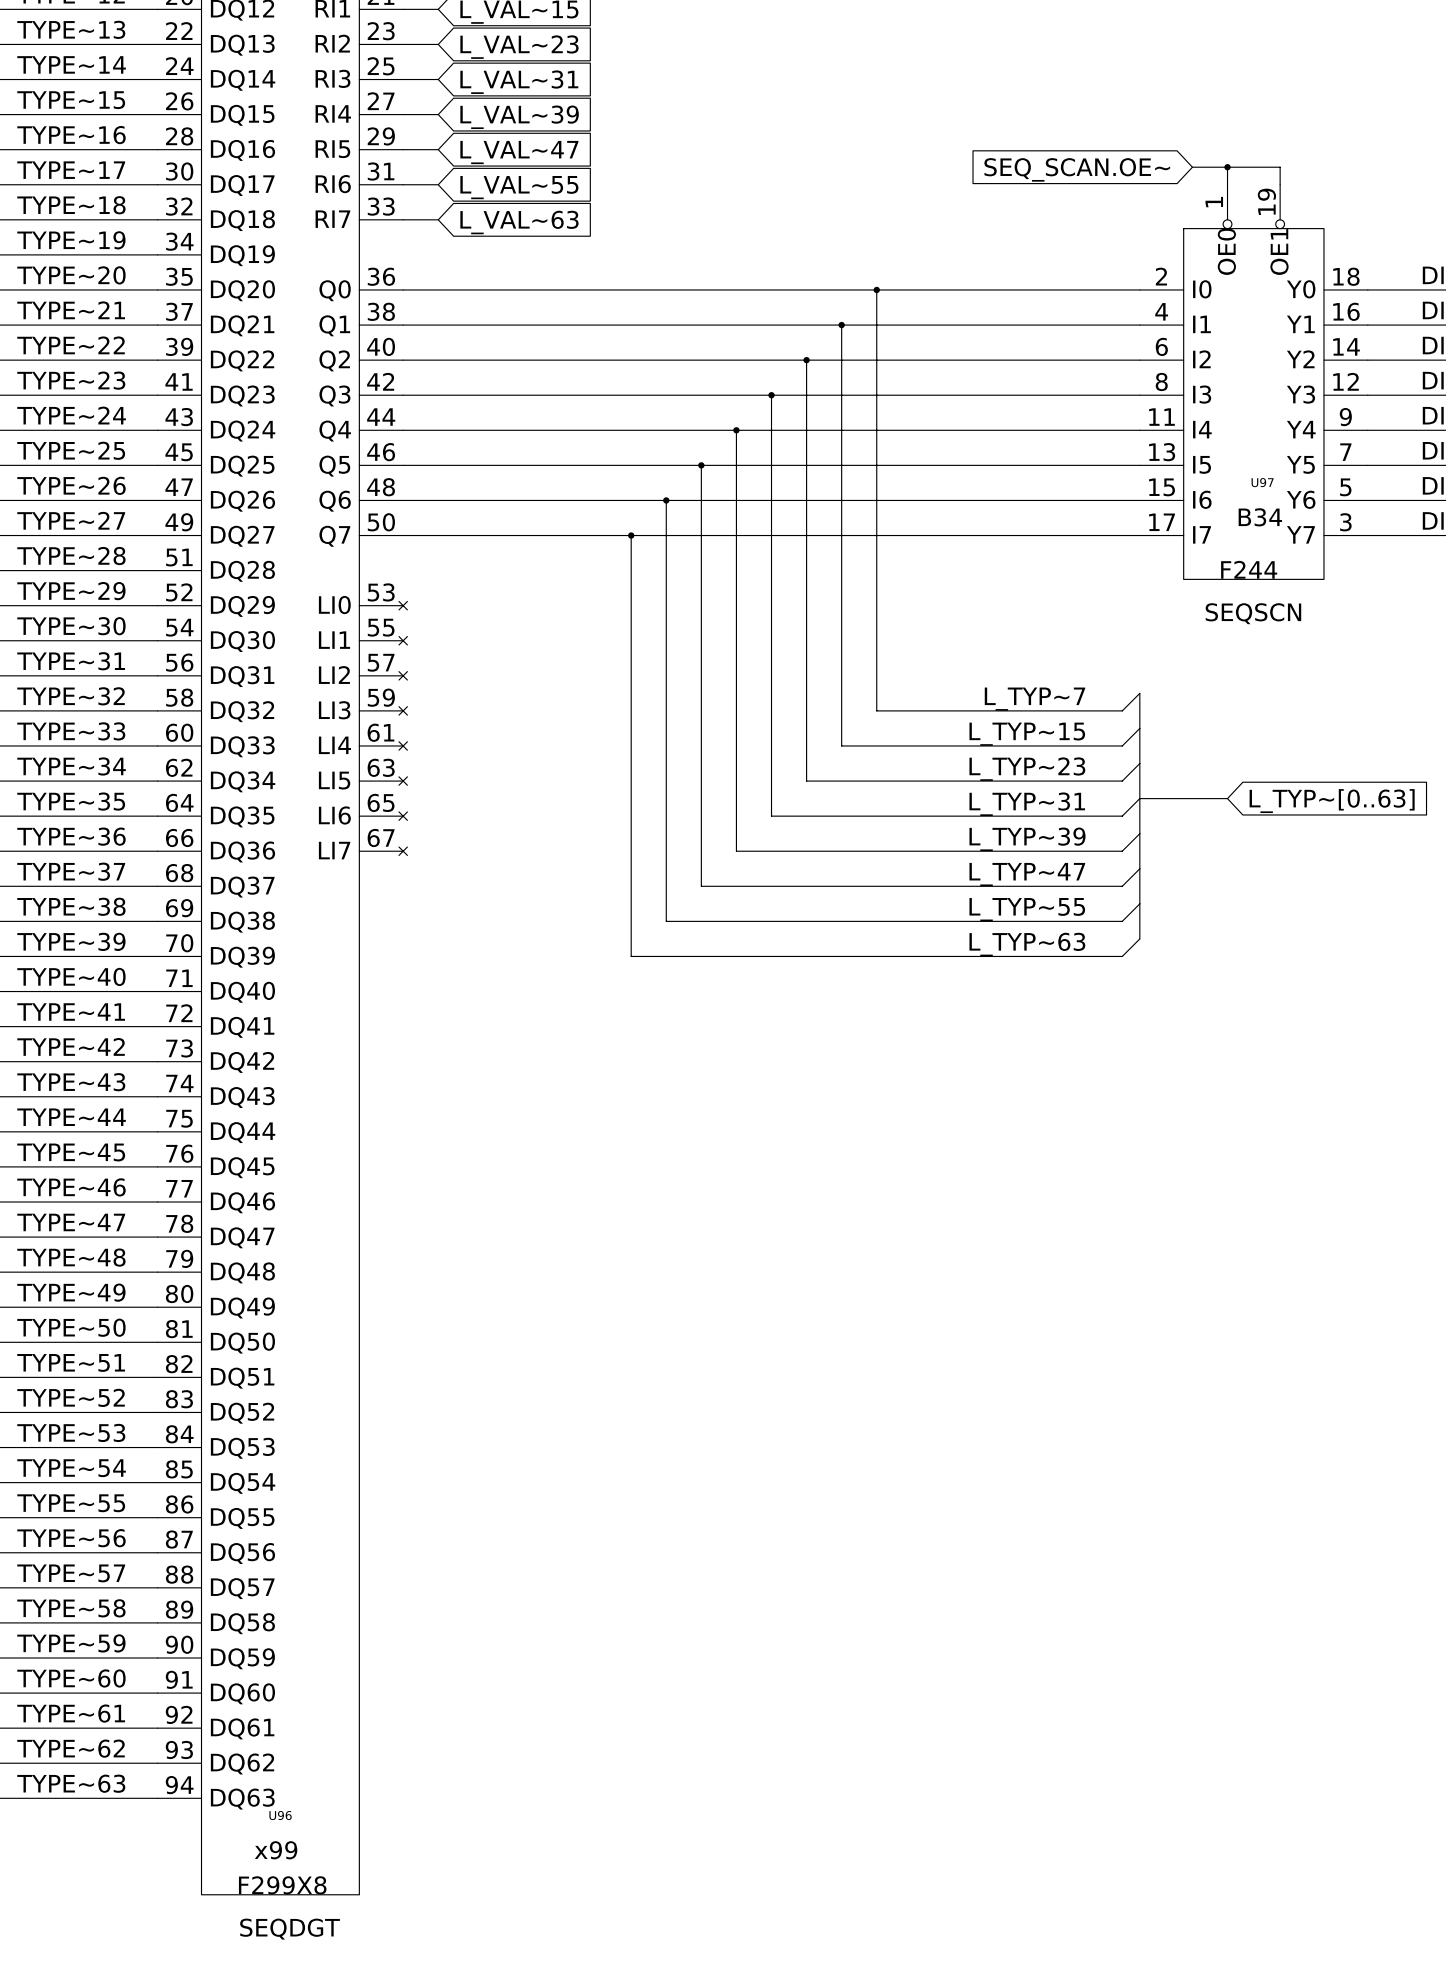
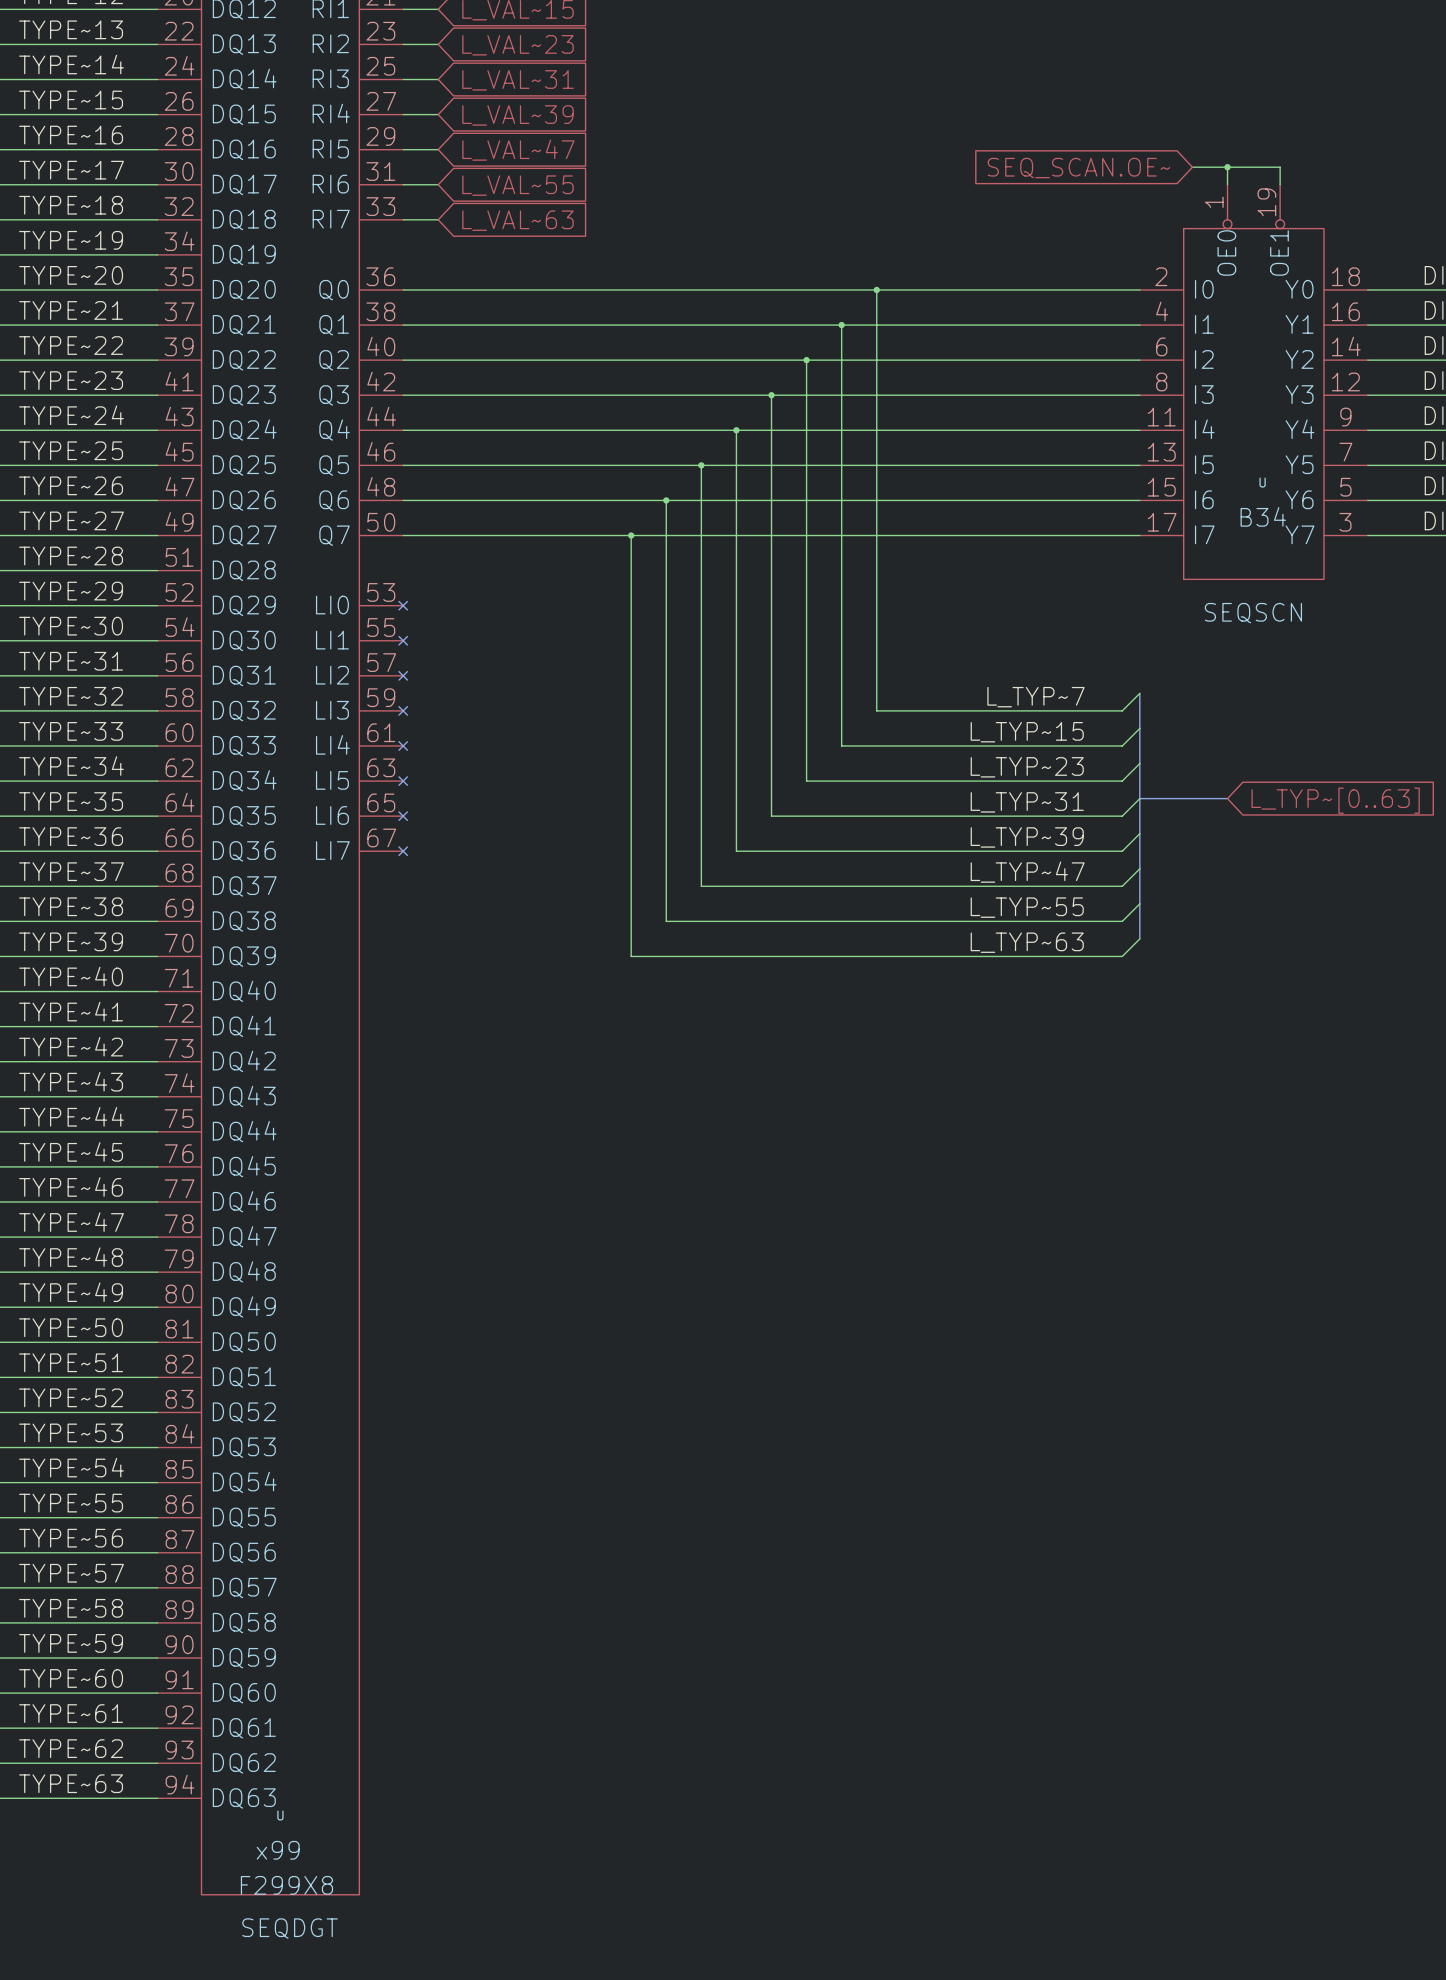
U97 name: U97 (1262, 482) -> U (1262, 482)
U97 value: F244 (1249, 569) -> none
U96 name: U96 (280, 1815) -> U (280, 1815)

